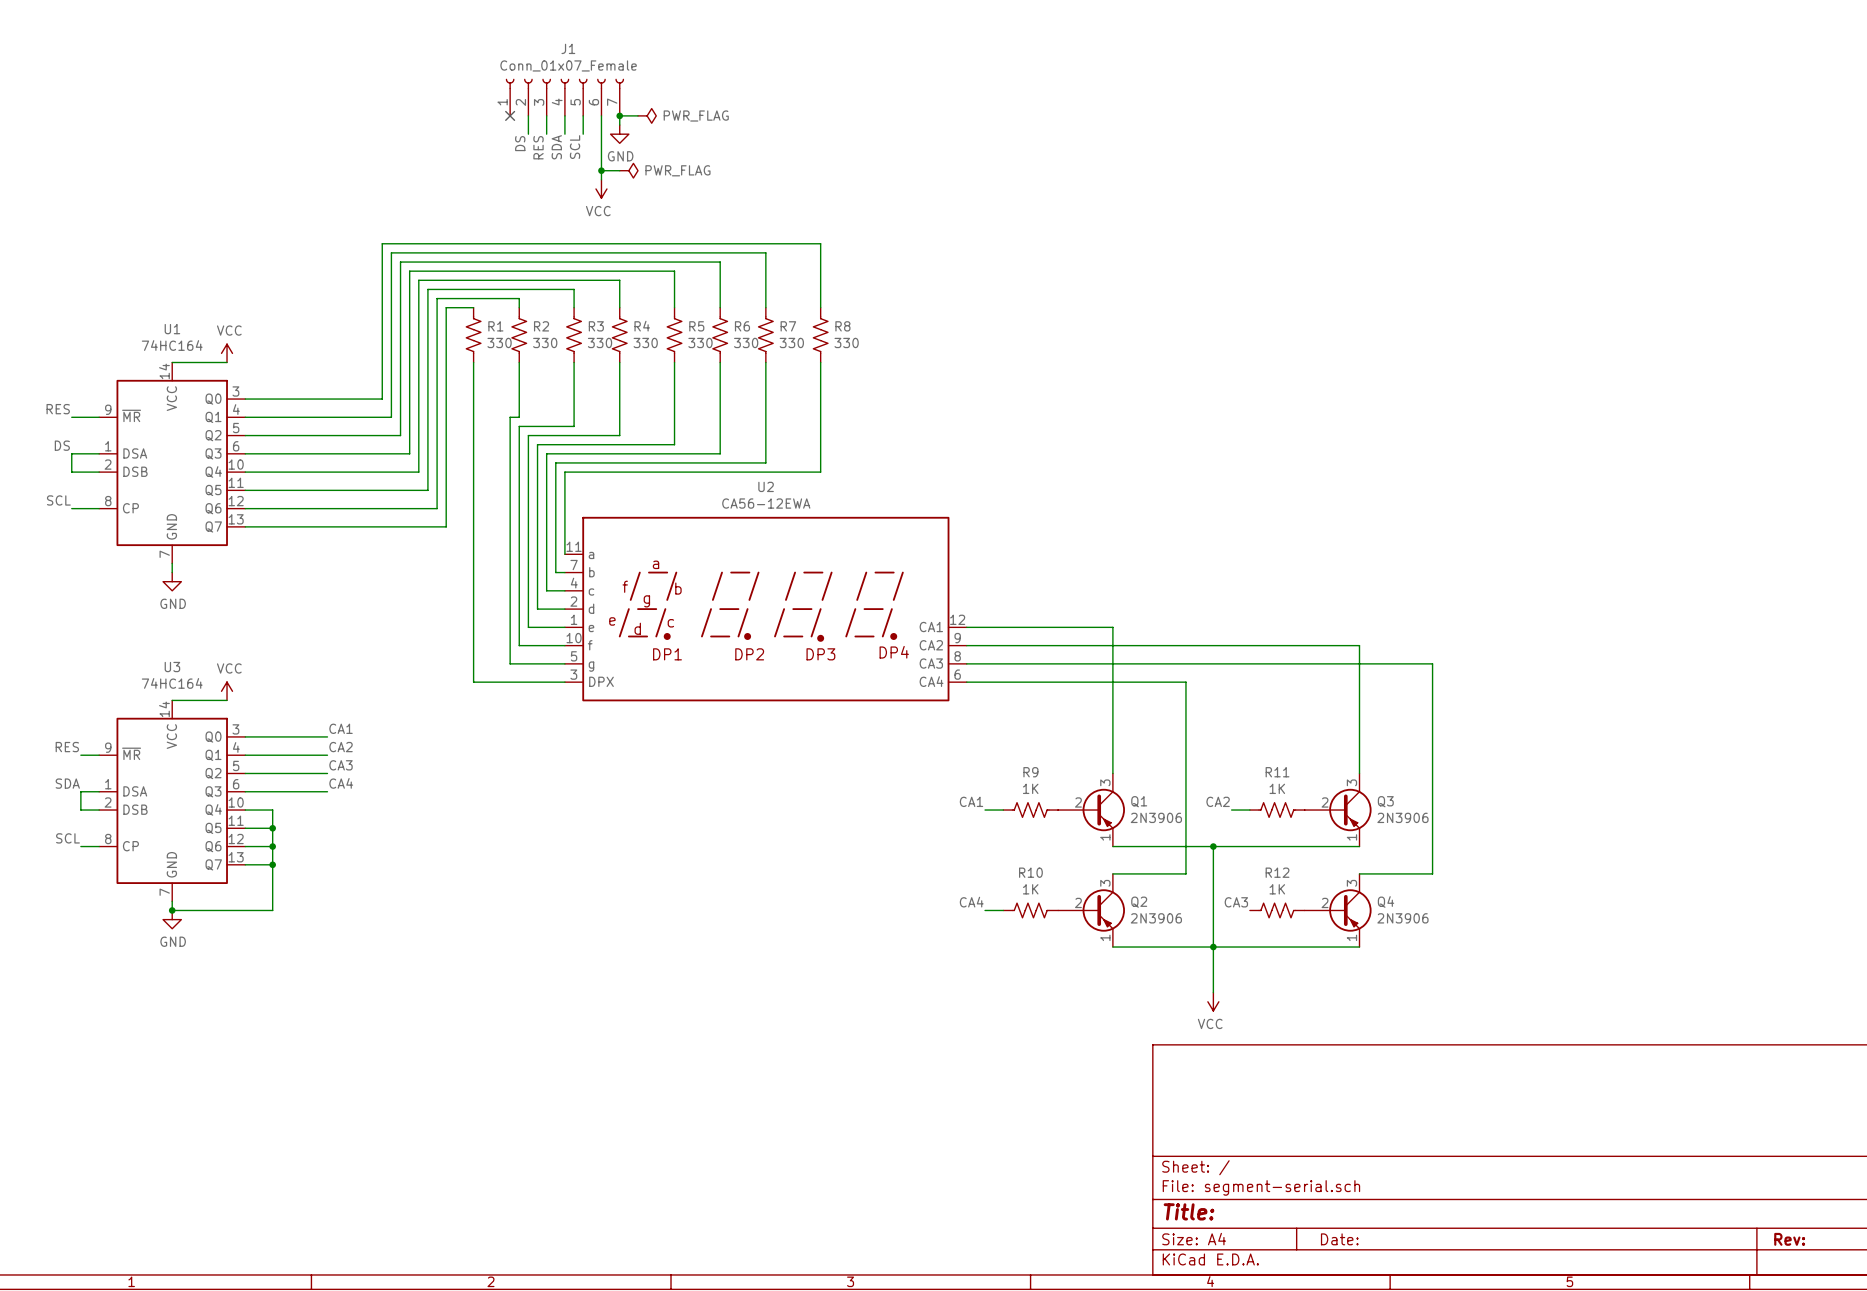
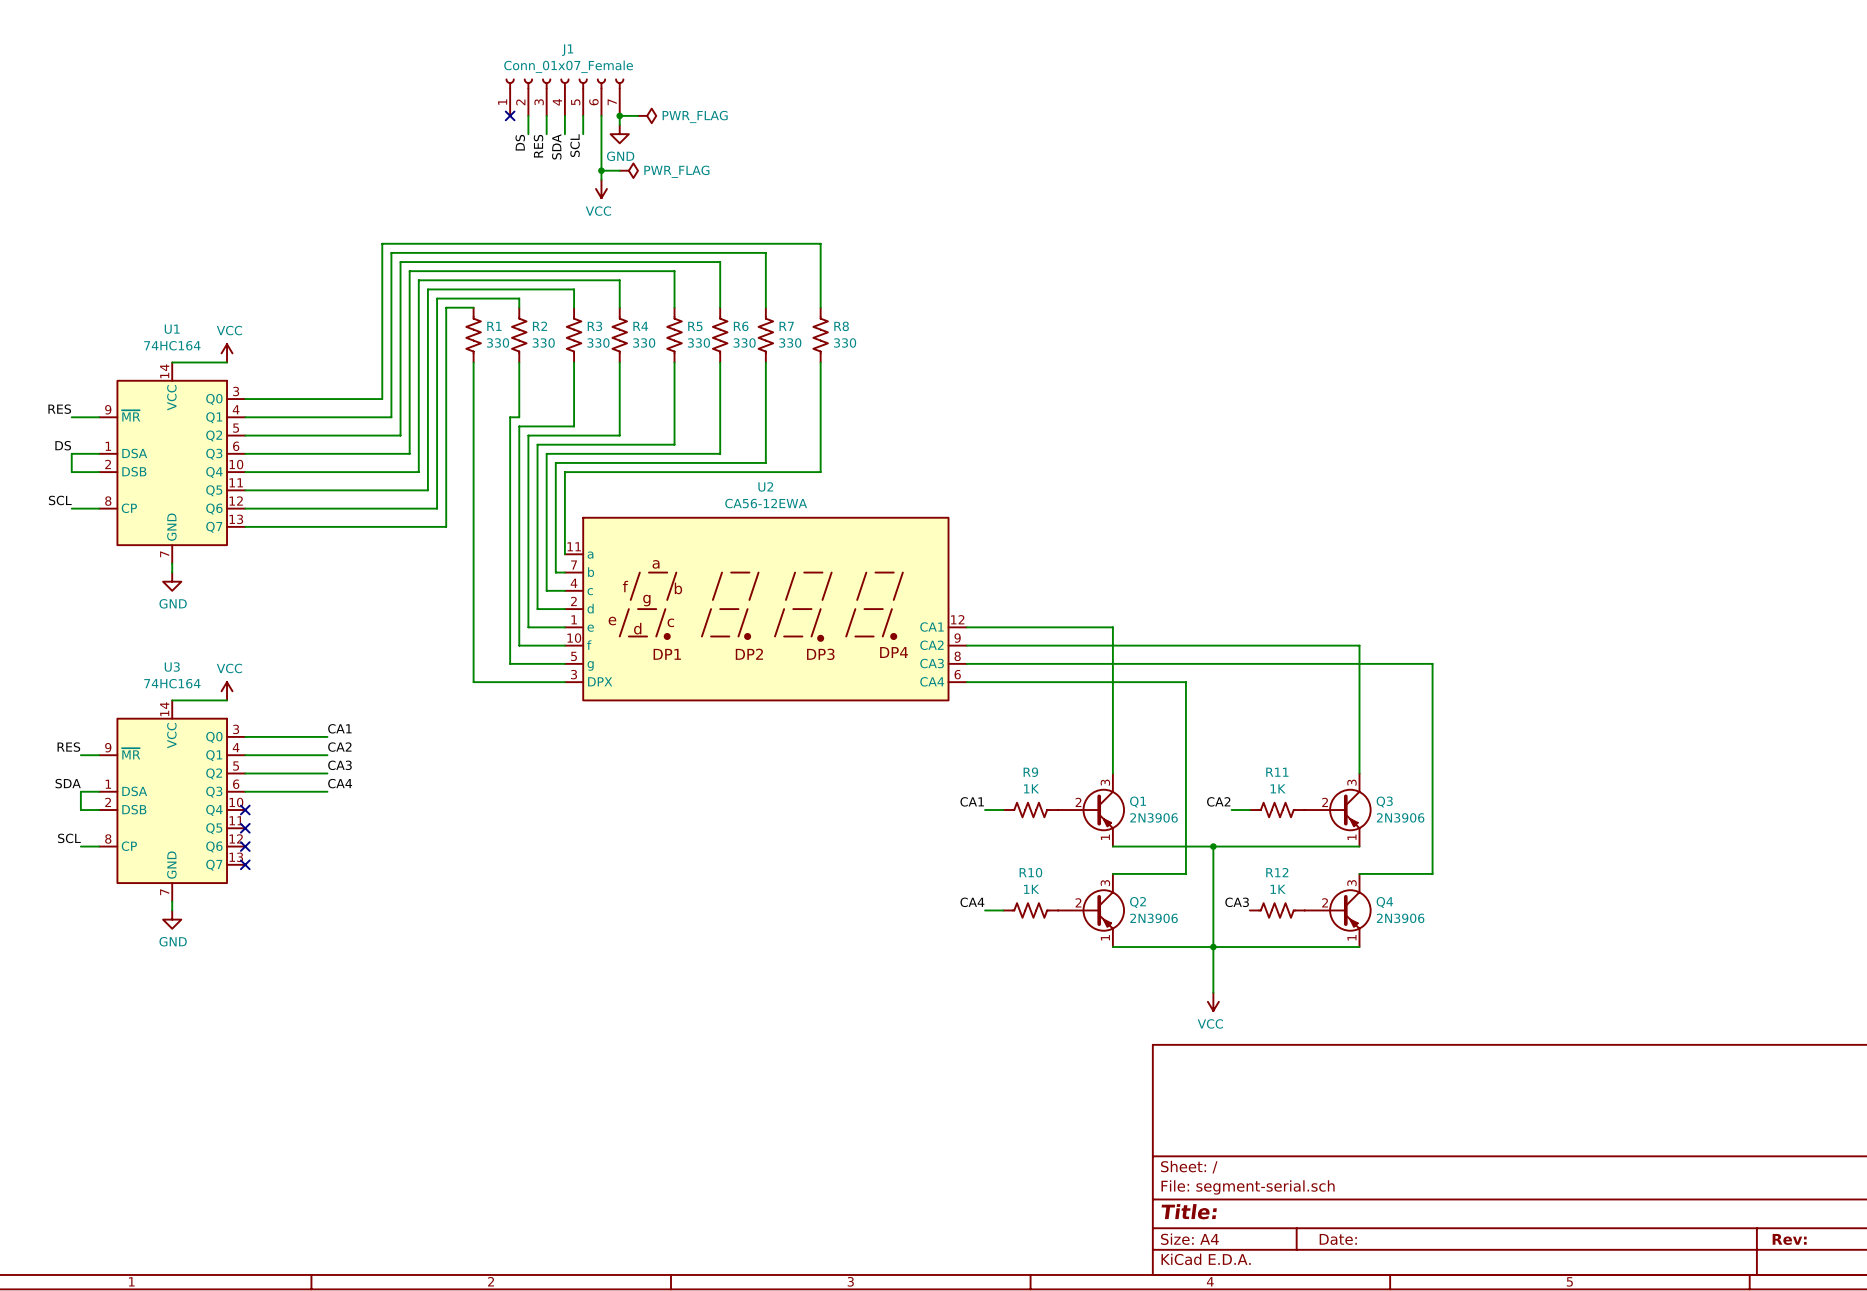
wire: (245, 810) (272, 810) (272, 910) (172, 910) -> none
no-connect mark: none -> (245, 810)
wire: (245, 828) (272, 828) -> none
no-connect mark: none -> (245, 828)
junction: (272, 828) -> none
wire: (245, 846) (272, 846) -> none
no-connect mark: none -> (245, 846)
junction: (272, 846) -> none
wire: (245, 864) (272, 864) -> none
no-connect mark: none -> (245, 864)
junction: (272, 864) -> none
junction: (172, 910) -> none

